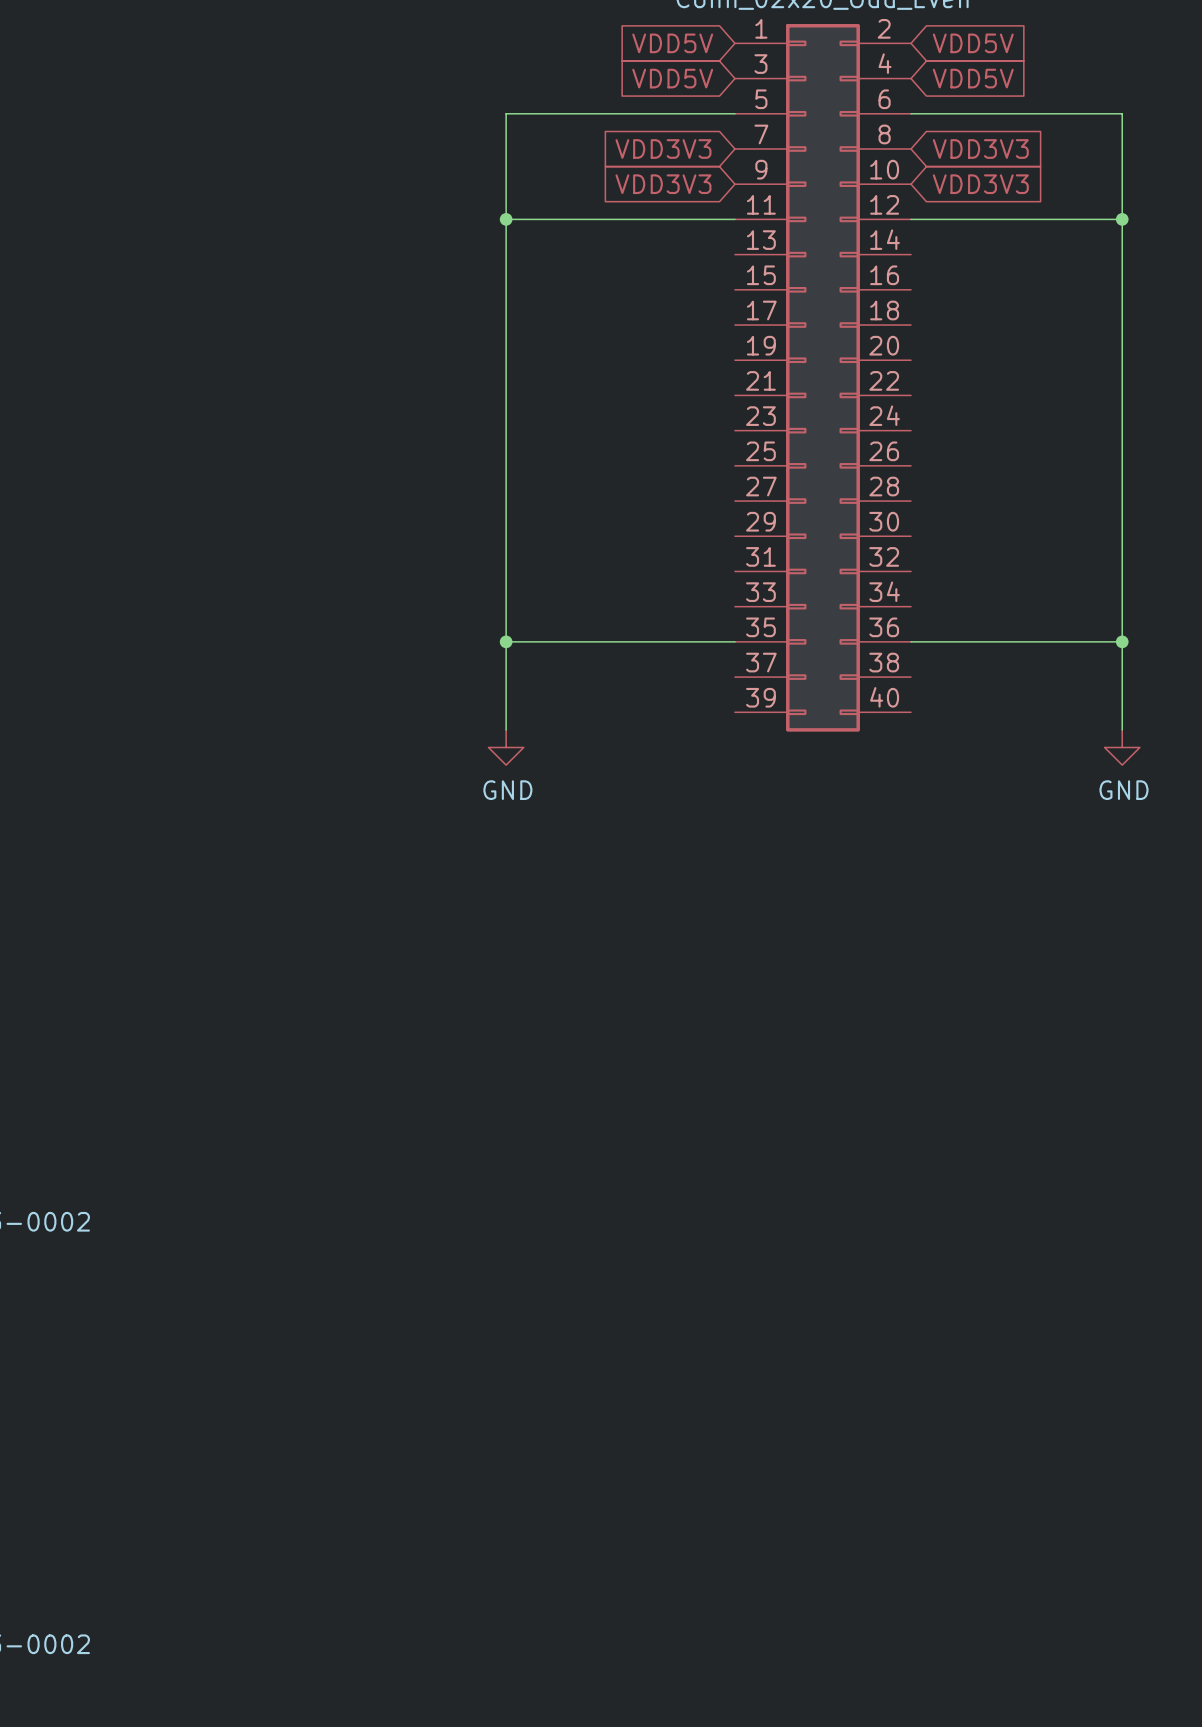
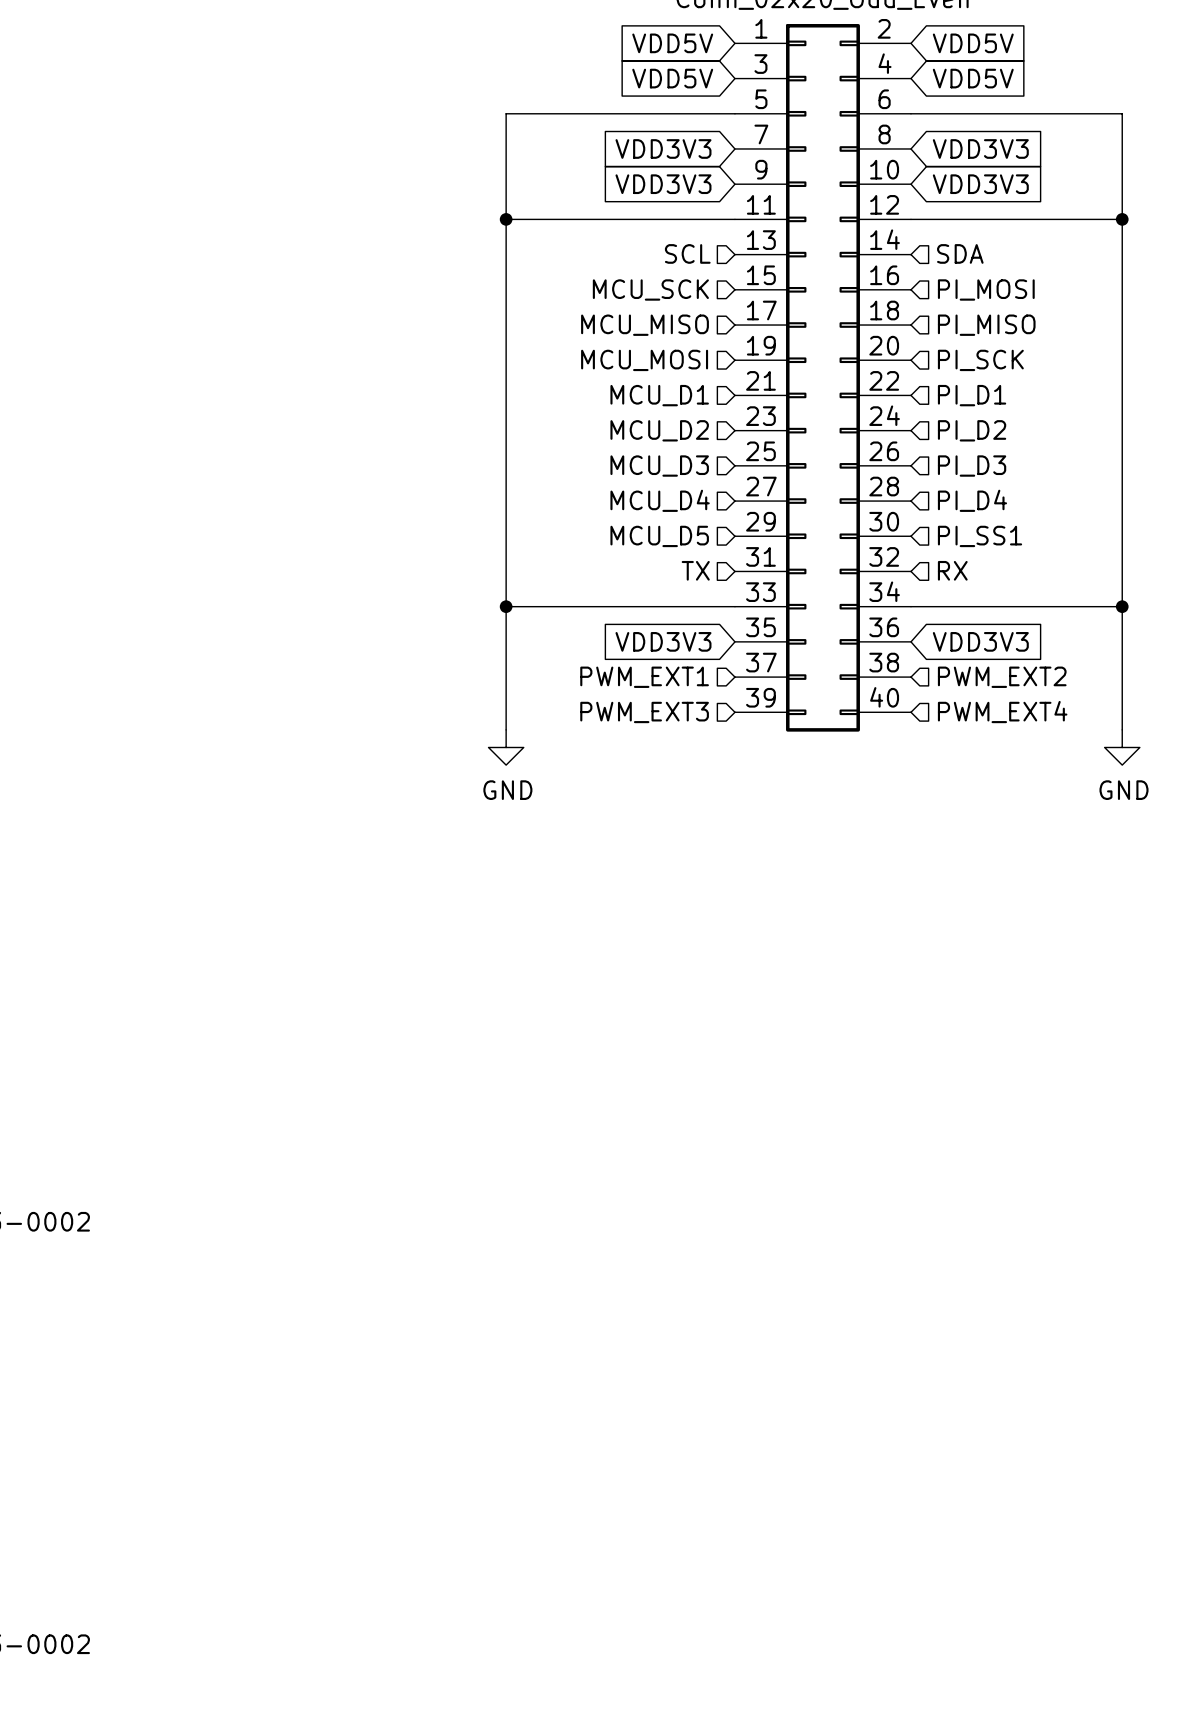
hierarchical label: none -> SCL (687, 253)
hierarchical label: none -> SDA (960, 253)
hierarchical label: none -> MCU_SCK (650, 289)
hierarchical label: none -> PI_MOSI (986, 289)
hierarchical label: none -> MCU_MISO (645, 325)
hierarchical label: none -> PI_MISO (986, 325)
hierarchical label: none -> MCU_MOSI (644, 360)
hierarchical label: none -> PI_SCK (980, 360)
hierarchical label: none -> MCU_D1 (659, 395)
hierarchical label: none -> PI_D1 (972, 395)
hierarchical label: none -> MCU_D2 (659, 430)
hierarchical label: none -> PI_D2 (972, 430)
hierarchical label: none -> MCU_D3 (659, 466)
hierarchical label: none -> PI_D3 (972, 466)
hierarchical label: none -> MCU_D4 (660, 500)
hierarchical label: none -> PI_D4 (972, 500)
hierarchical label: none -> MCU_D5 (659, 536)
hierarchical label: none -> PI_SS1 (980, 536)
hierarchical label: none -> TX (695, 570)
hierarchical label: none -> RX (952, 570)
wire: (506, 641) (734, 641) -> (506, 606) (734, 606)
junction position: (506, 641) -> (506, 606)
global label: none -> VDD3V3 (663, 641)
wire: (911, 641) (1122, 641) -> (911, 606) (1122, 606)
global label: none -> VDD3V3 (980, 641)
junction position: (1122, 641) -> (1122, 606)
hierarchical label: none -> PWM_EXT1 (644, 677)
hierarchical label: none -> PWM_EXT2 (1002, 677)
hierarchical label: none -> PWM_EXT3 (644, 712)
hierarchical label: none -> PWM_EXT4 (1002, 712)

